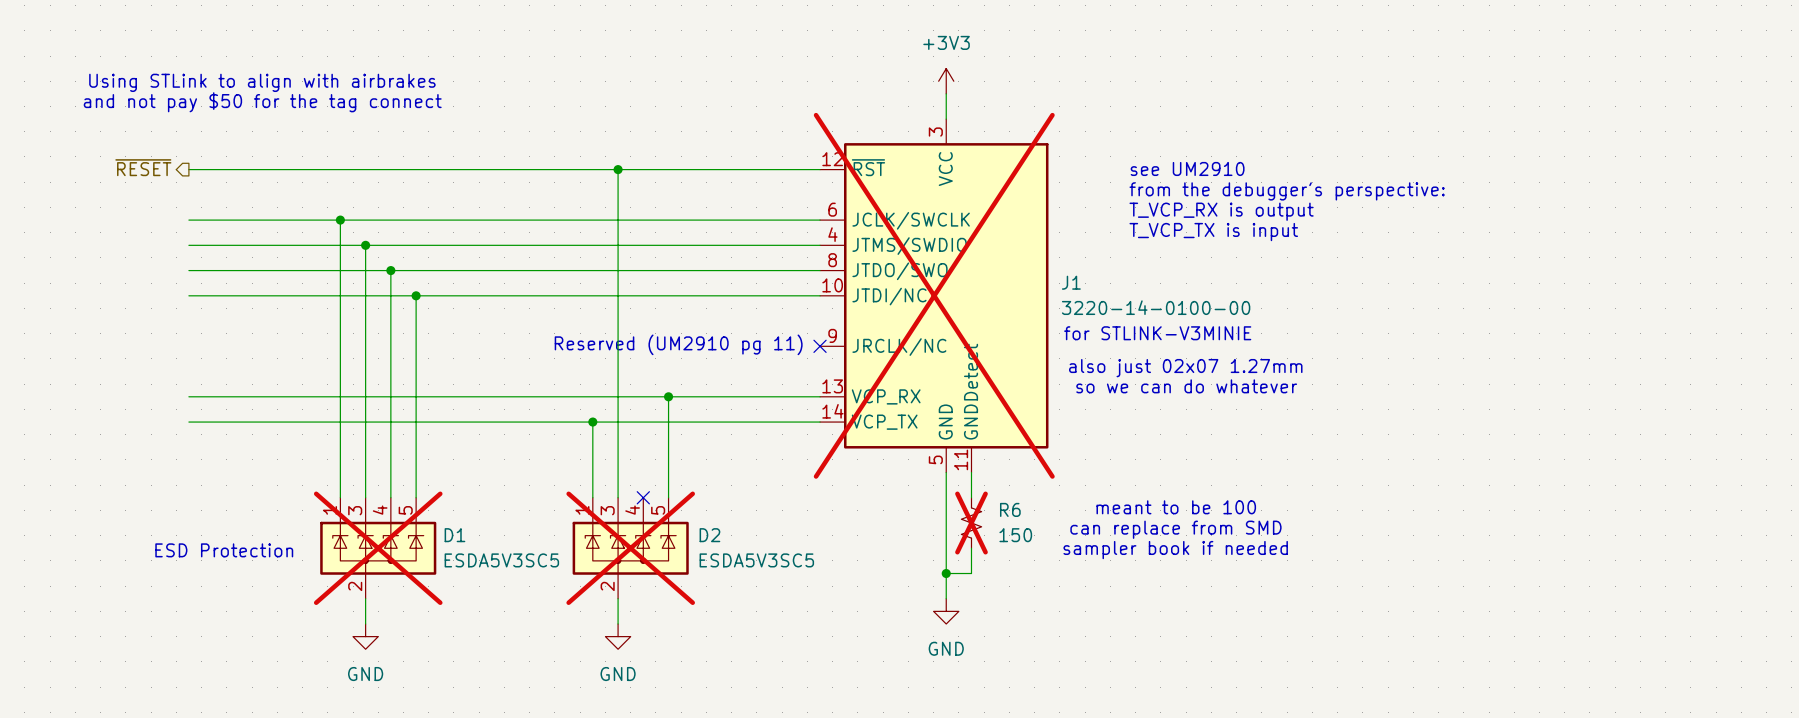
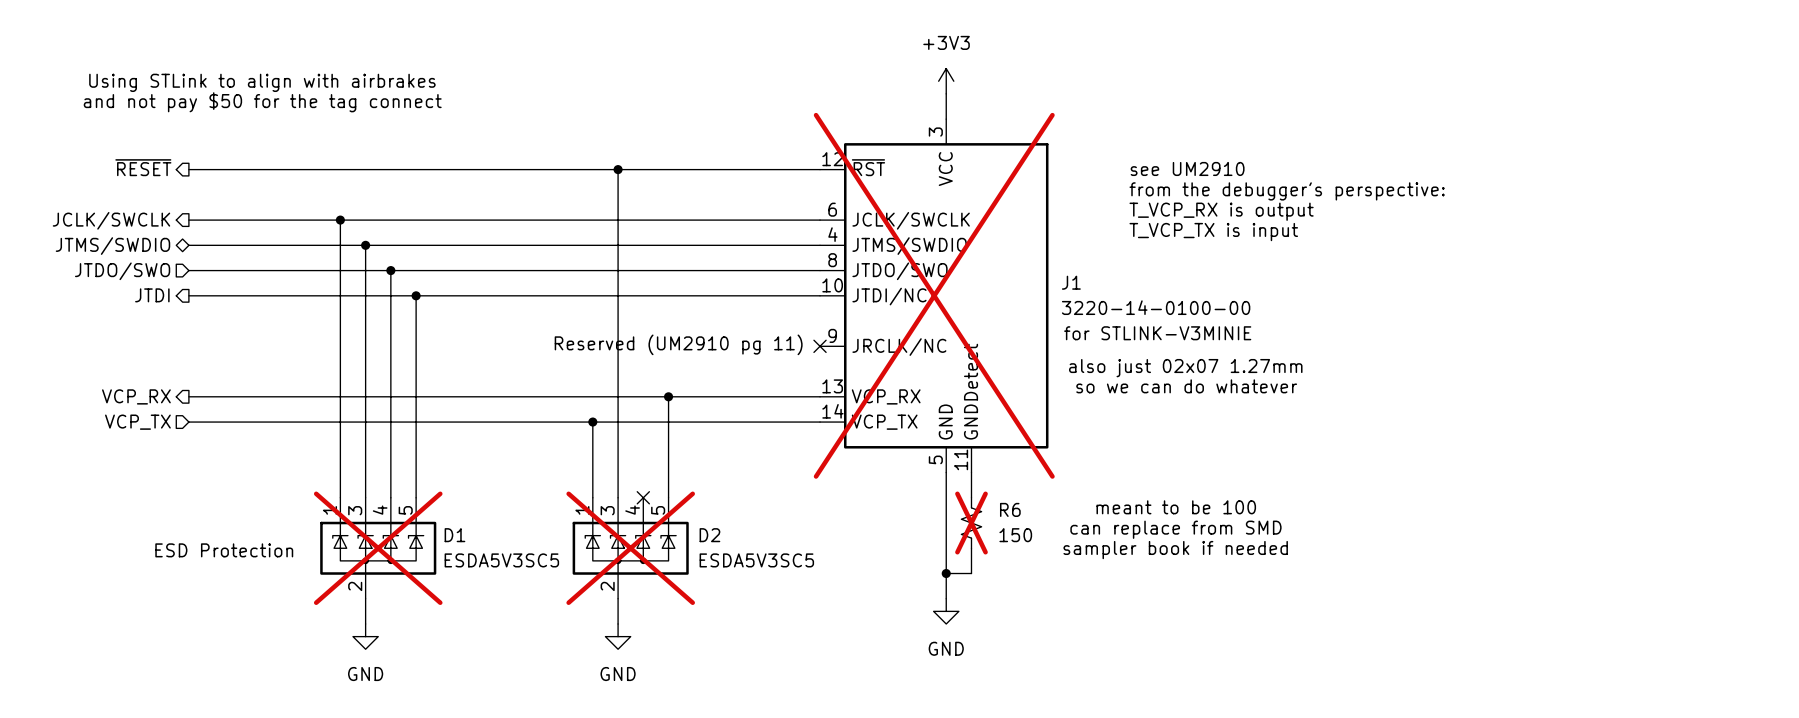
hierarchical label: none -> JCLK/SWCLK (111, 220)
hierarchical label: none -> JTMS/SWDIO (112, 246)
hierarchical label: none -> JTDO/SWO (122, 271)
hierarchical label: none -> JTDI (152, 295)
hierarchical label: none -> VCP_RX (136, 396)
hierarchical label: none -> VCP_TX (137, 422)

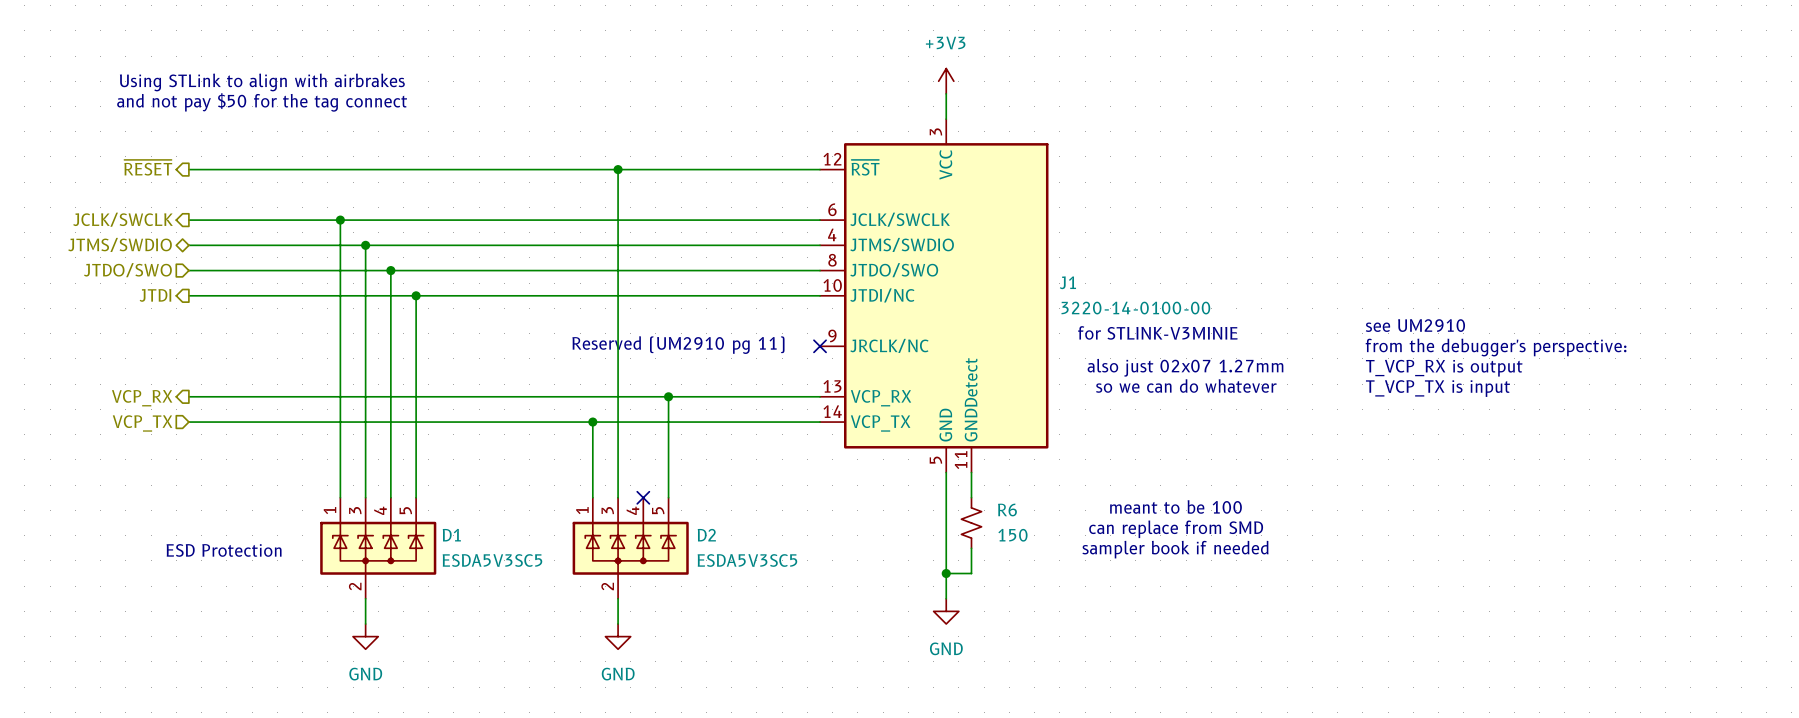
text: see UM2910 (1187, 168) -> none
text: from the debugger's perspective: (1287, 191) -> none
text: T_VCP_RX is output (1221, 211) -> none
text: T_VCP_TX is input (1213, 232) -> none
J1 do-not-place cross: (934, 295) -> none
text: none -> see UM2910 (1415, 325)
text: none -> from the debugger's perspective: (1496, 347)
text: none -> T_VCP_RX is output (1444, 368)
text: none -> T_VCP_TX is input (1437, 388)
R6 do-not-place cross: (971, 523) -> none
D1 do-not-place cross: (378, 548) -> none
D2 do-not-place cross: (630, 548) -> none

